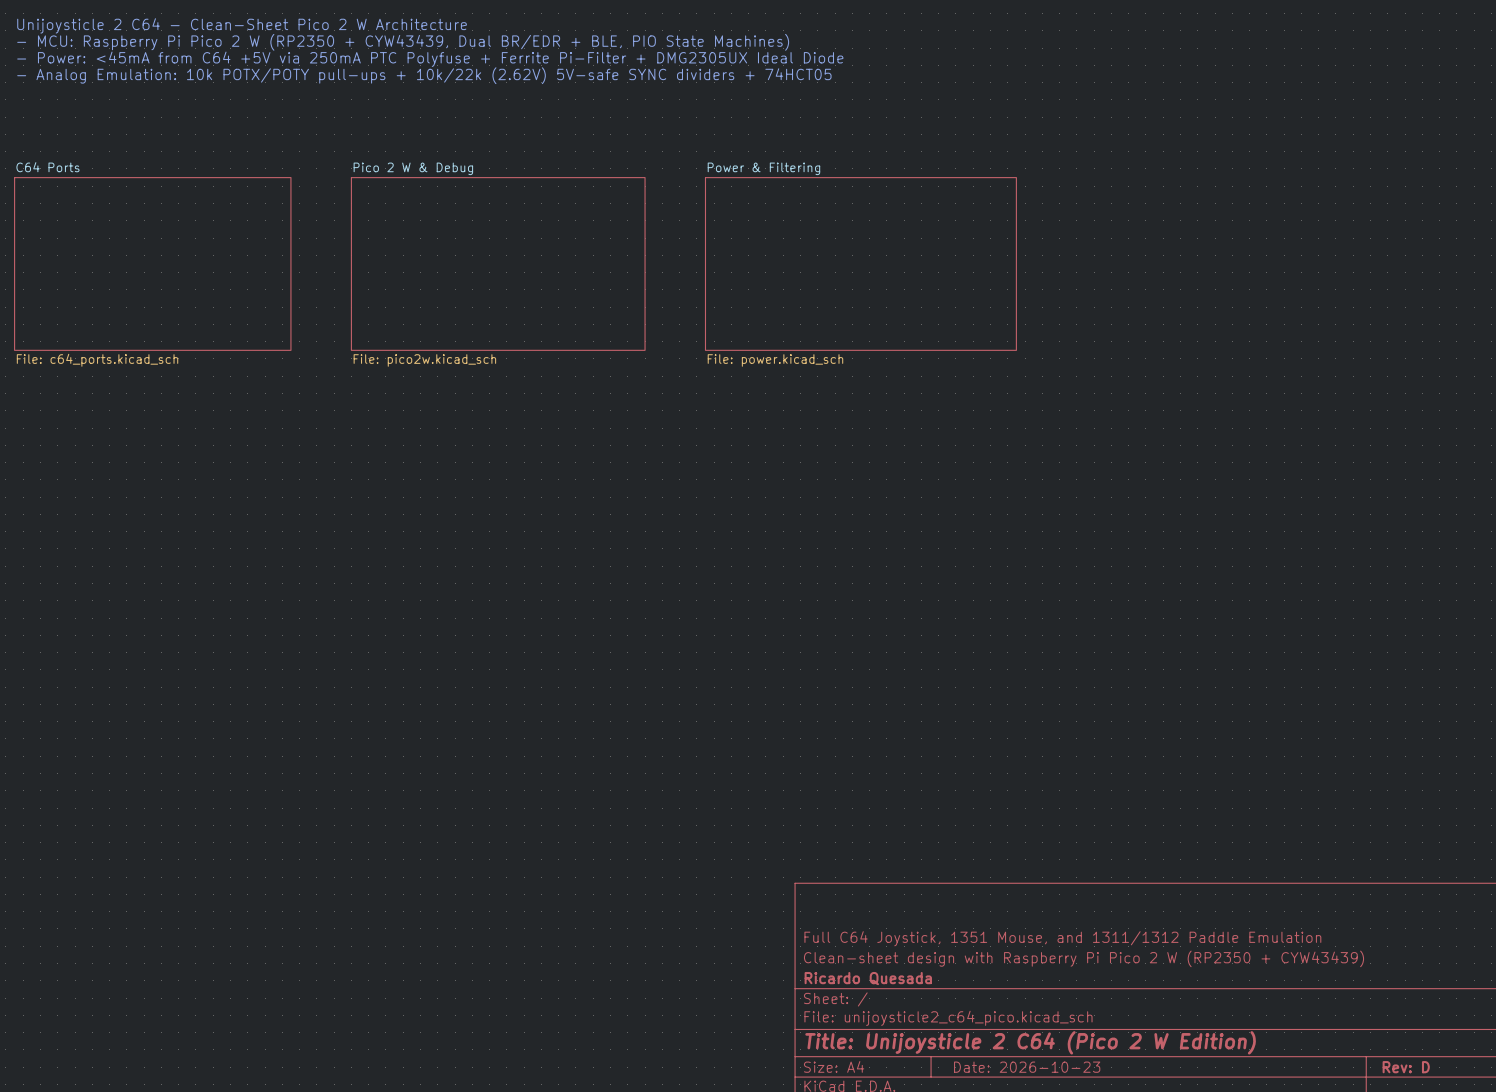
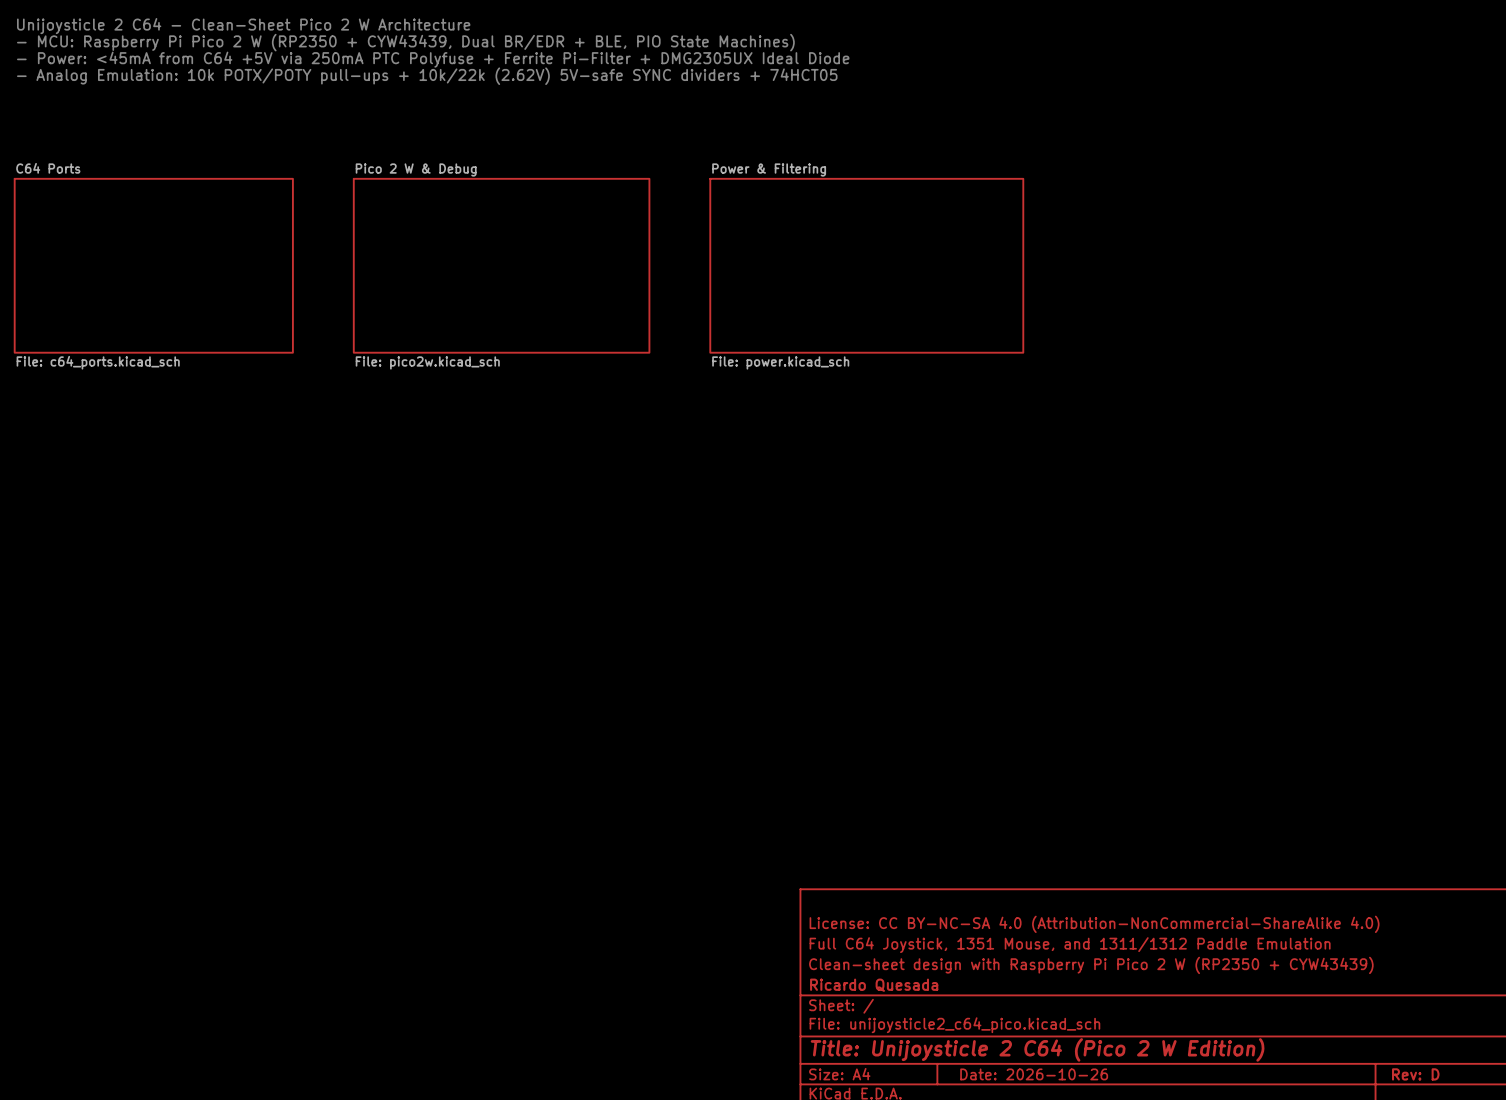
title block: none -> License: CC BY-NC-SA 4.0 (Attribution-NonCommercial-ShareAlike 4.0) (1094, 924)
title block: Date: 2026-10-23 (1027, 1067) -> Date: 2026-10-26 (1034, 1074)

